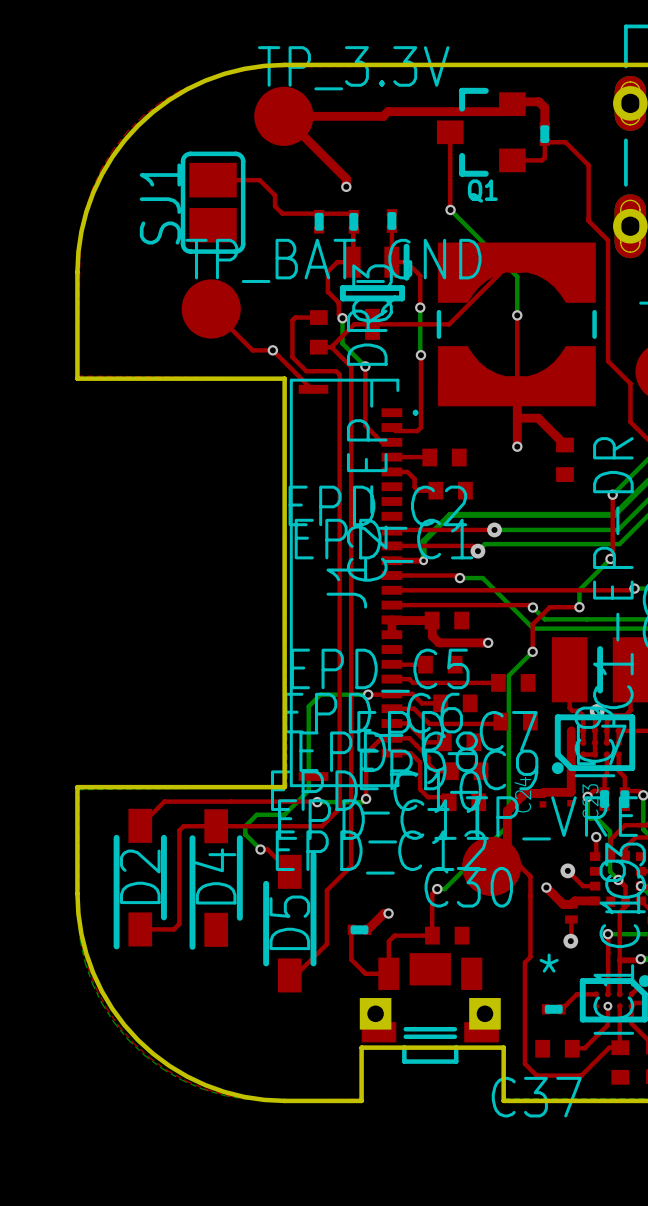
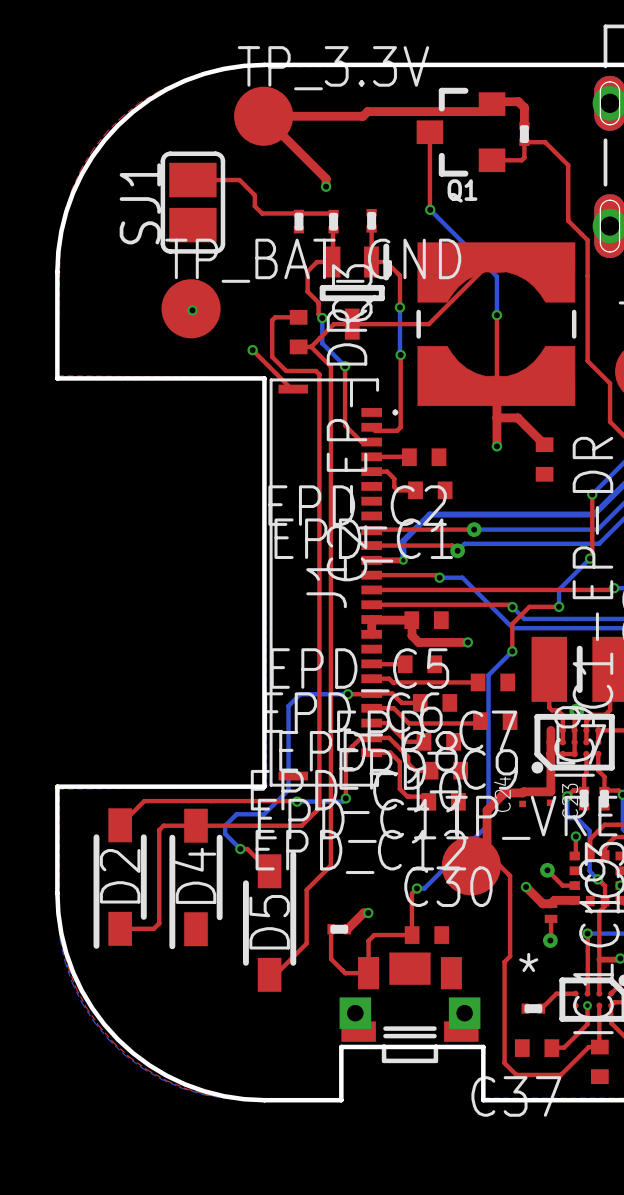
top track: (211, 308) (252, 350) (272, 350) -> none
via: none -> (192, 310)

